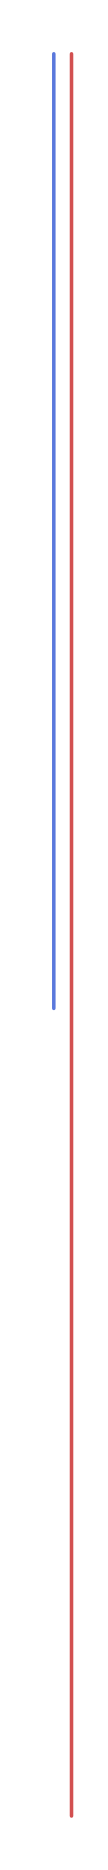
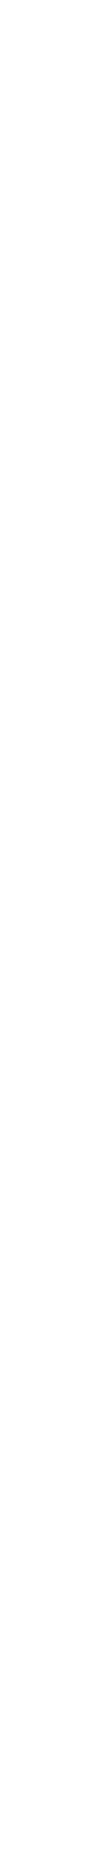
bottom track: (53, 53) (53, 1008) -> none
top track: (71, 53) (71, 1816) -> none

